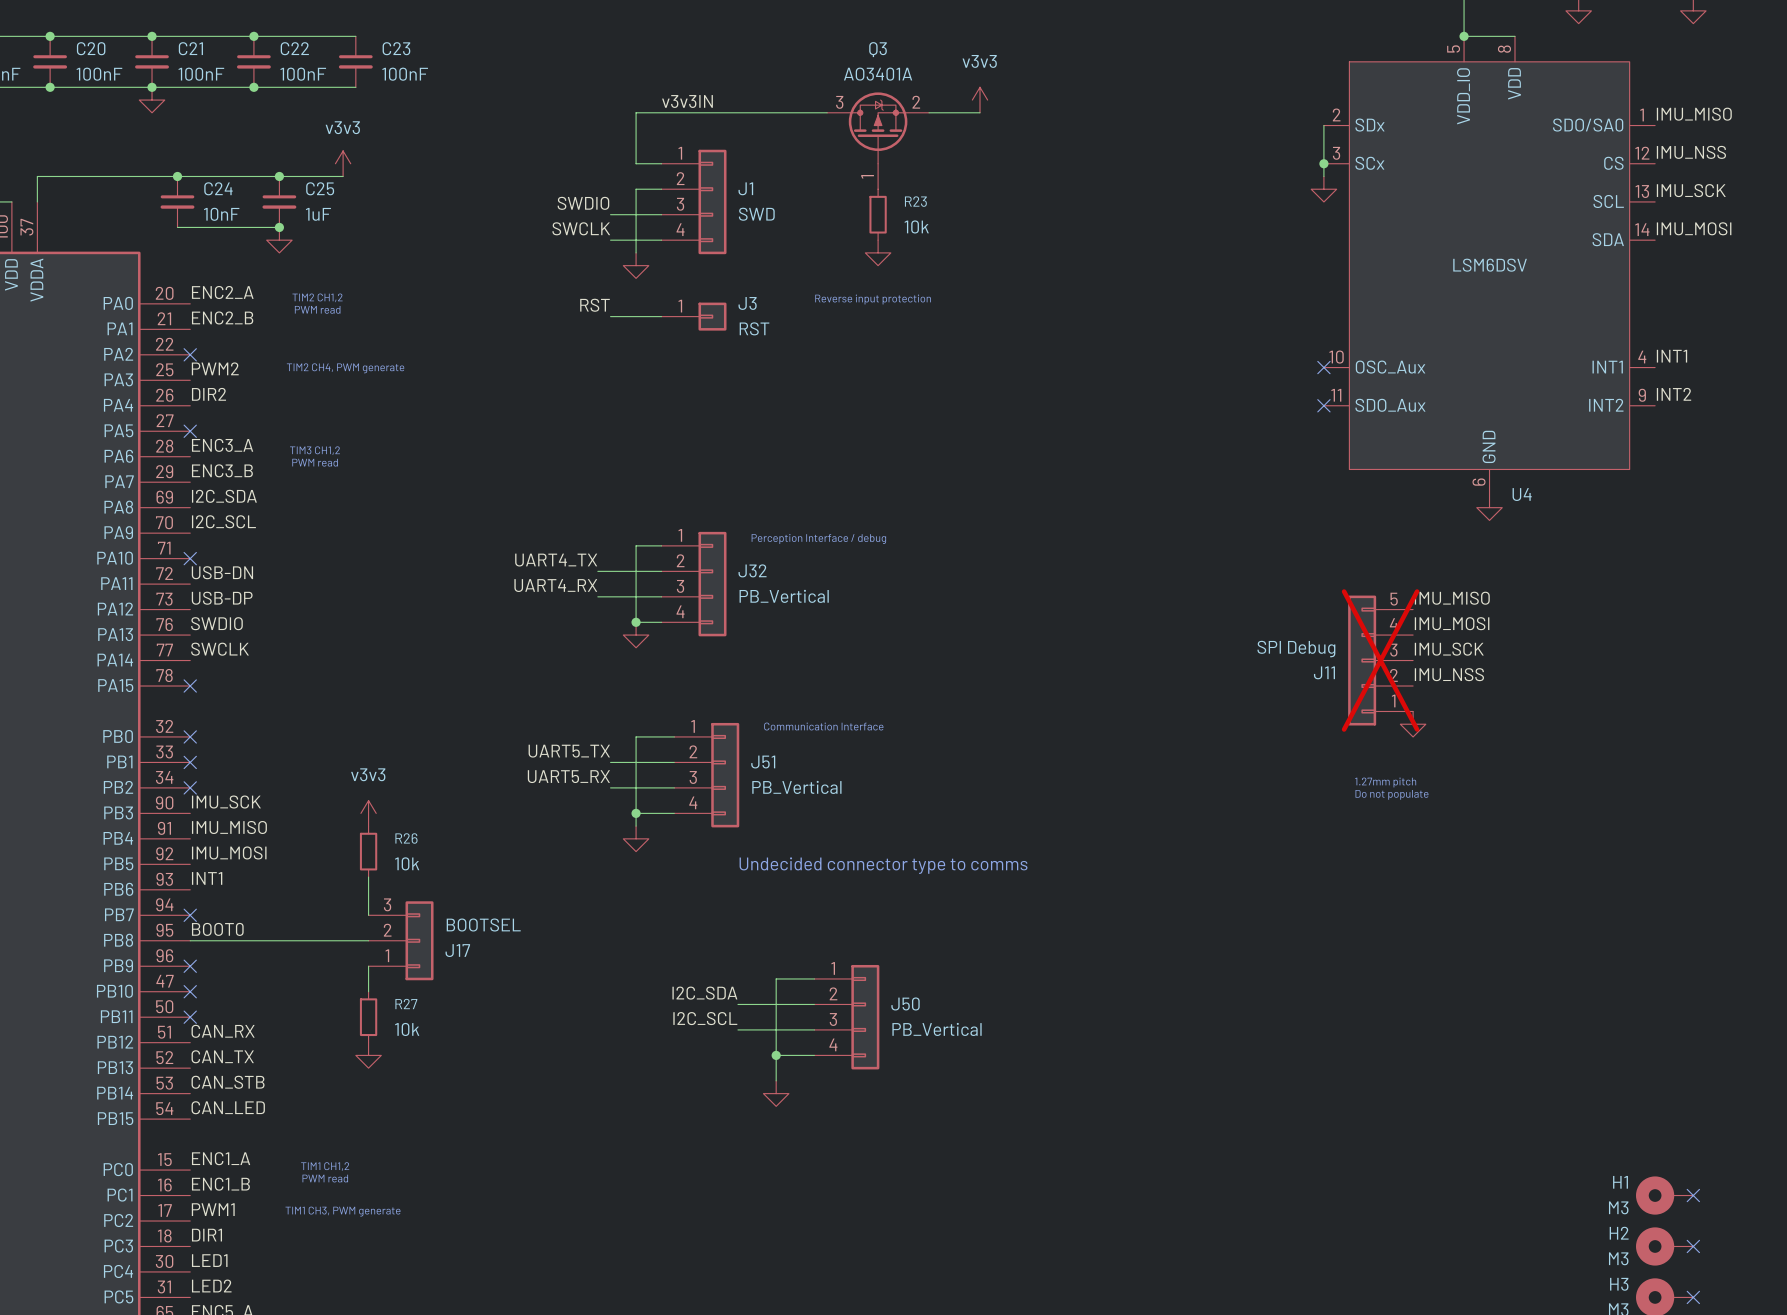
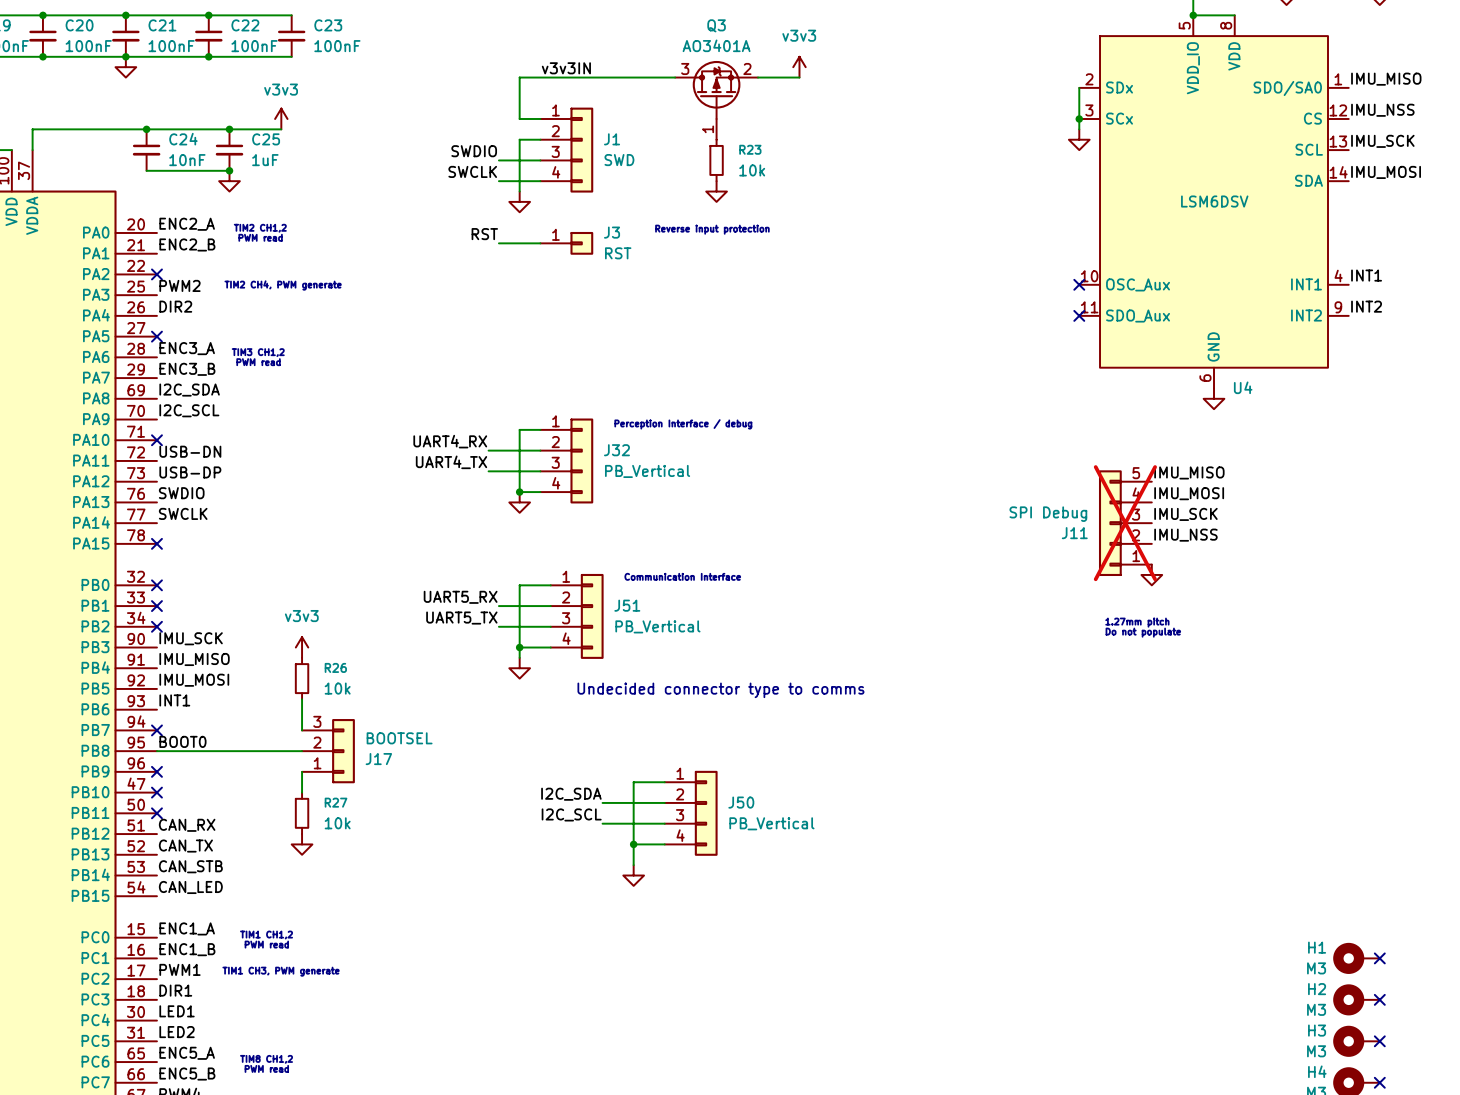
label: UART4_TX (556, 560) -> UART4_RX (450, 441)
label: UART4_RX (555, 585) -> UART4_TX (451, 462)
label: UART5_TX (569, 751) -> UART5_RX (460, 597)
label: UART5_RX (568, 776) -> UART5_TX (461, 618)

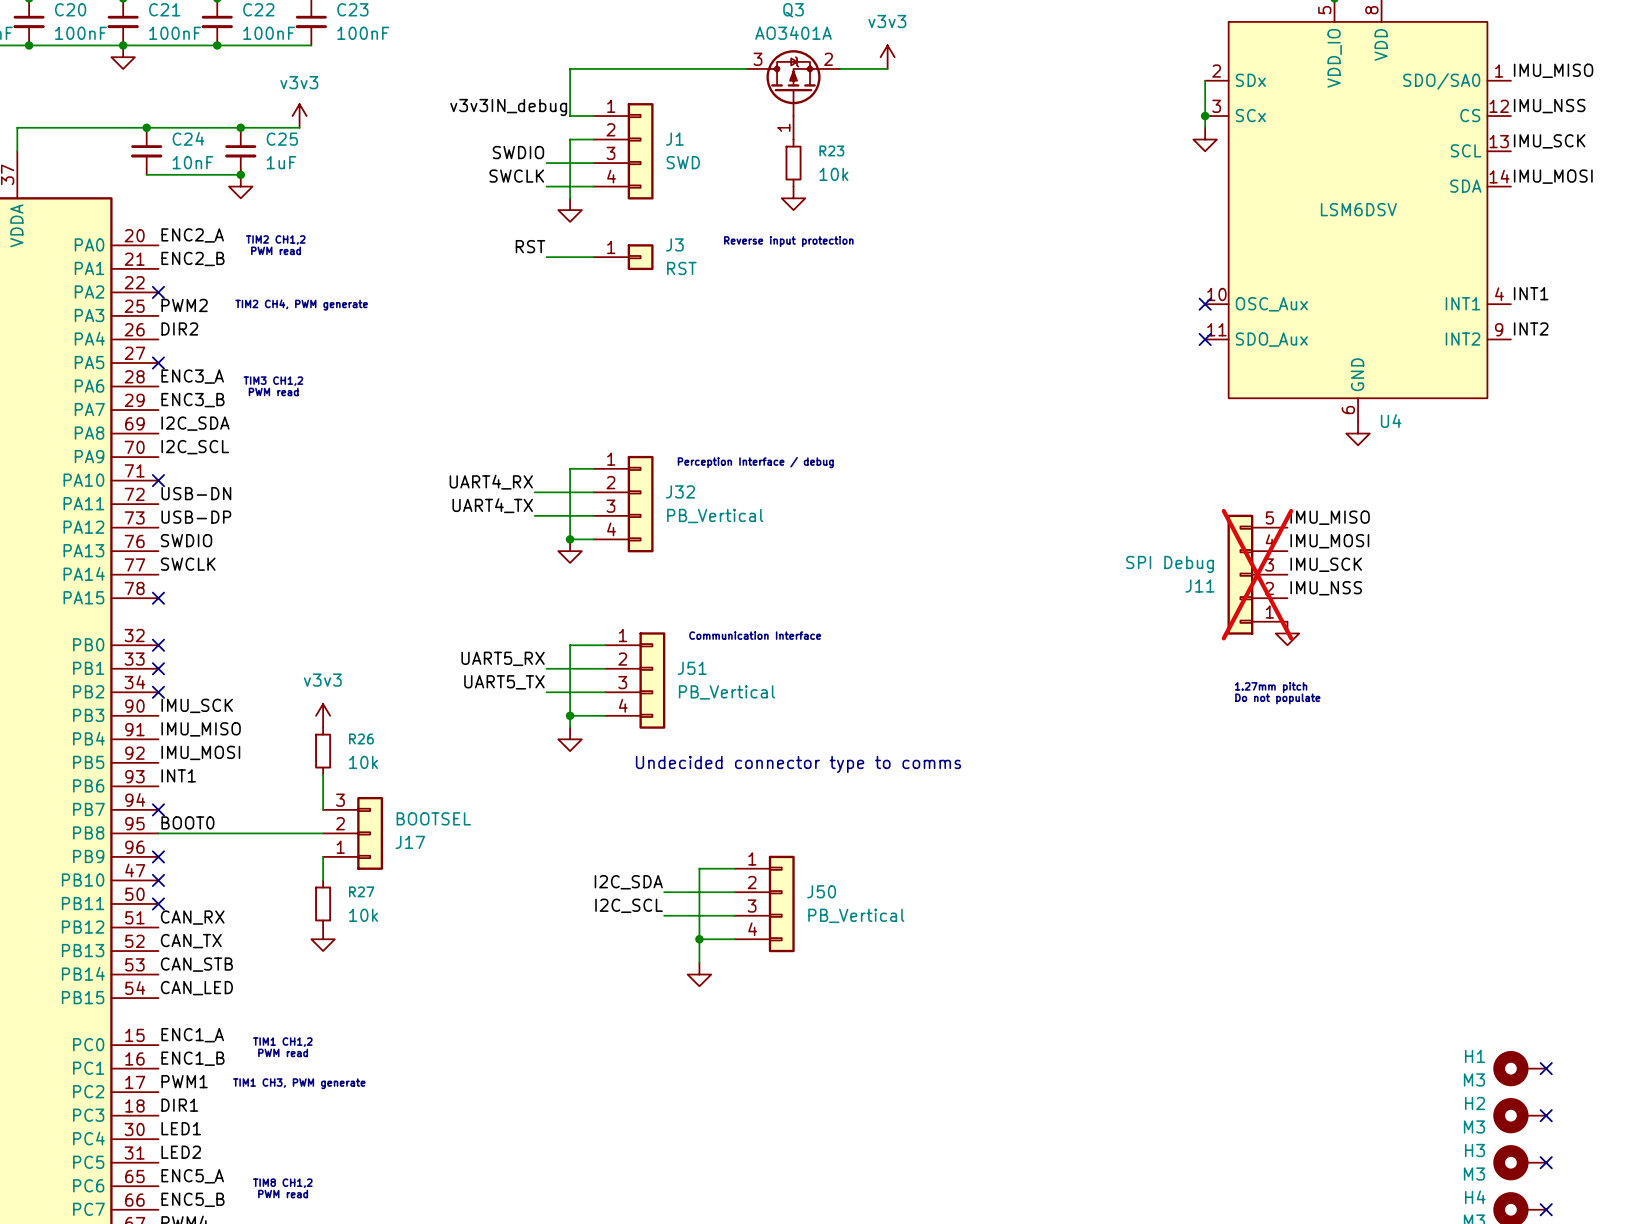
label: v3v3IN (566, 68) -> none
label: none -> v3v3IN_debug (508, 107)

